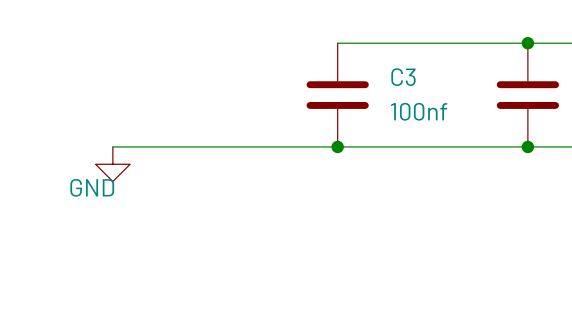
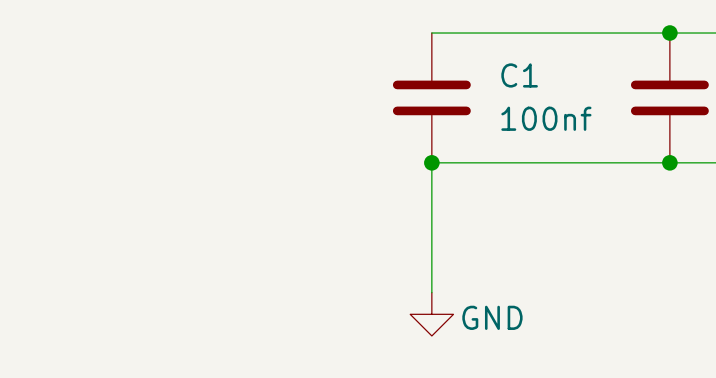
C3 name: C3 (403, 77) -> C1 (519, 75)
wire: (112, 146) (337, 146) -> (431, 292) (431, 162)
power symbol position: GND (112, 164) -> GND (431, 314)
power symbol text position: GND (92, 187) -> GND (492, 317)

